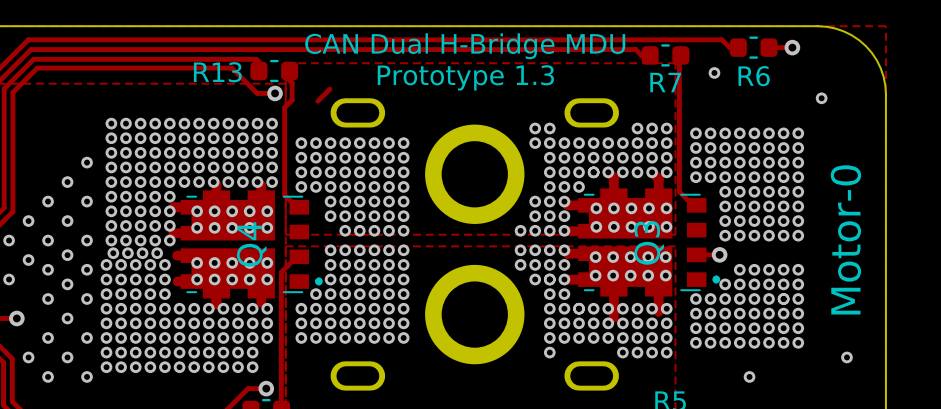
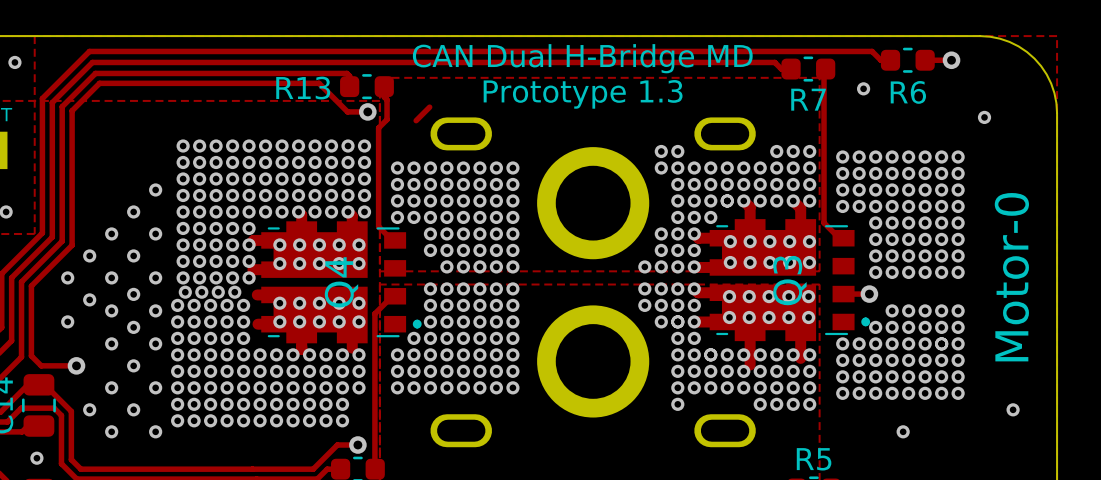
text: CAN Dual H-Bridge MDU (465, 46) -> CAN Dual H-Bridge MD (582, 58)

